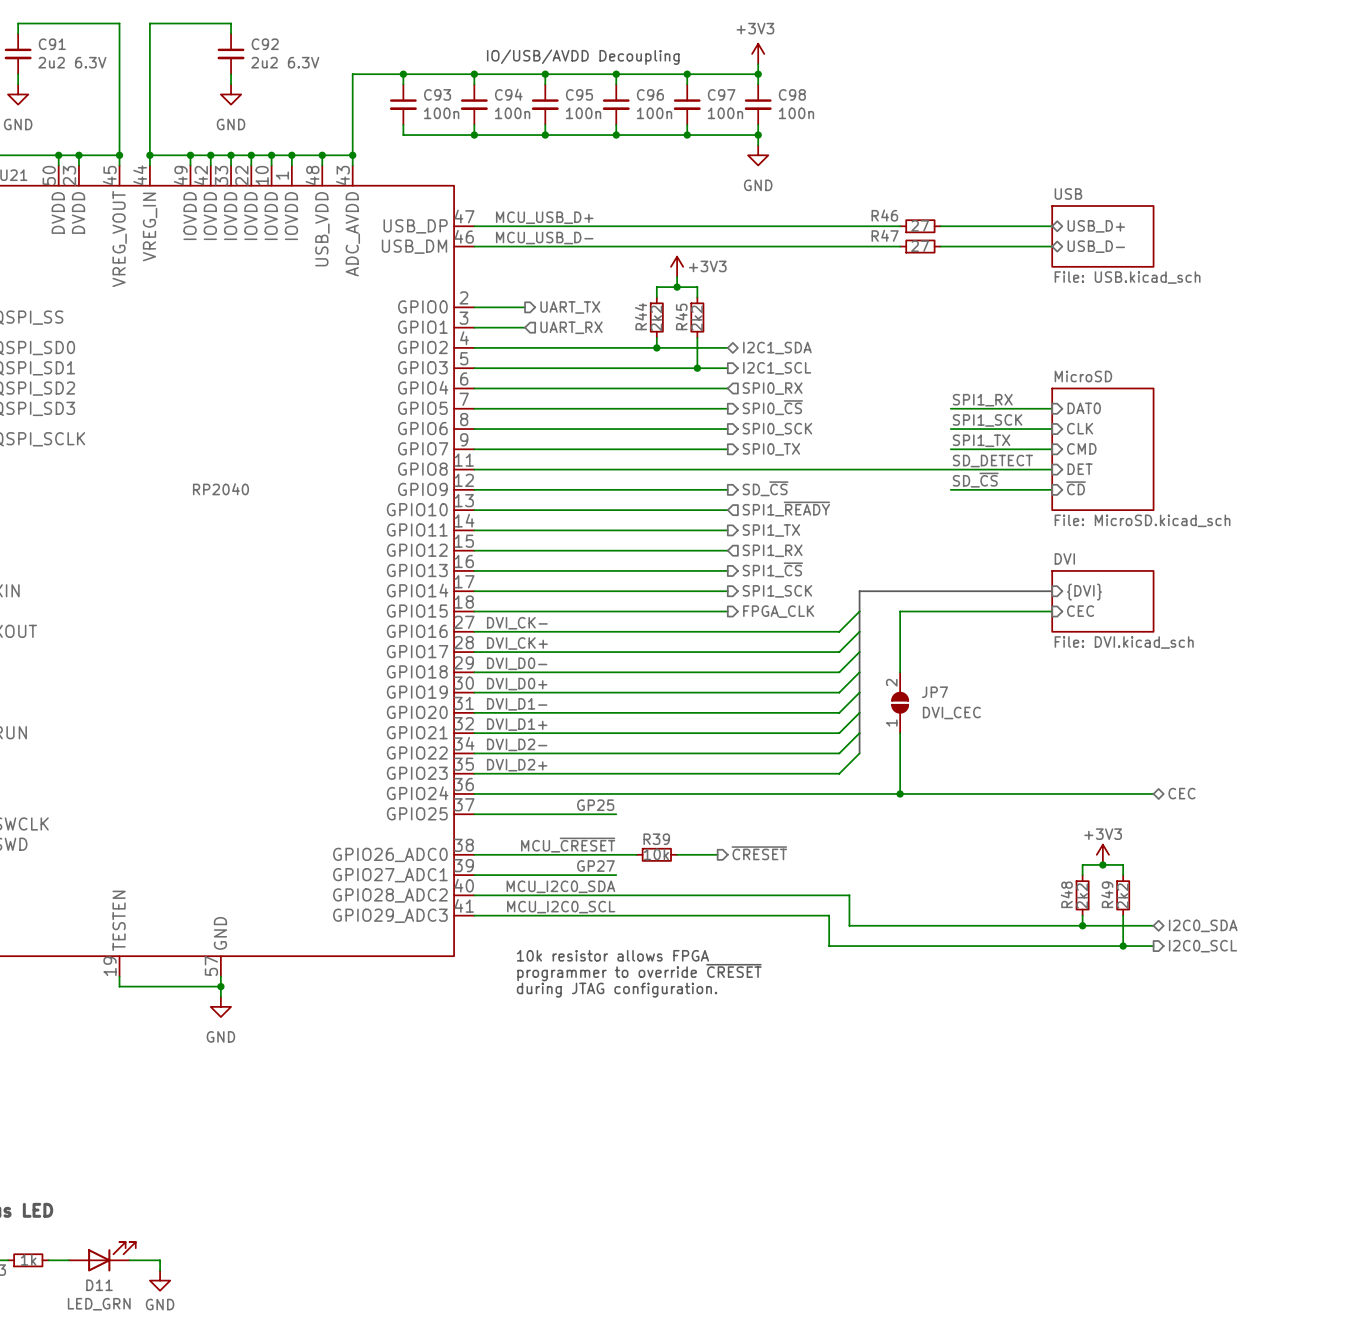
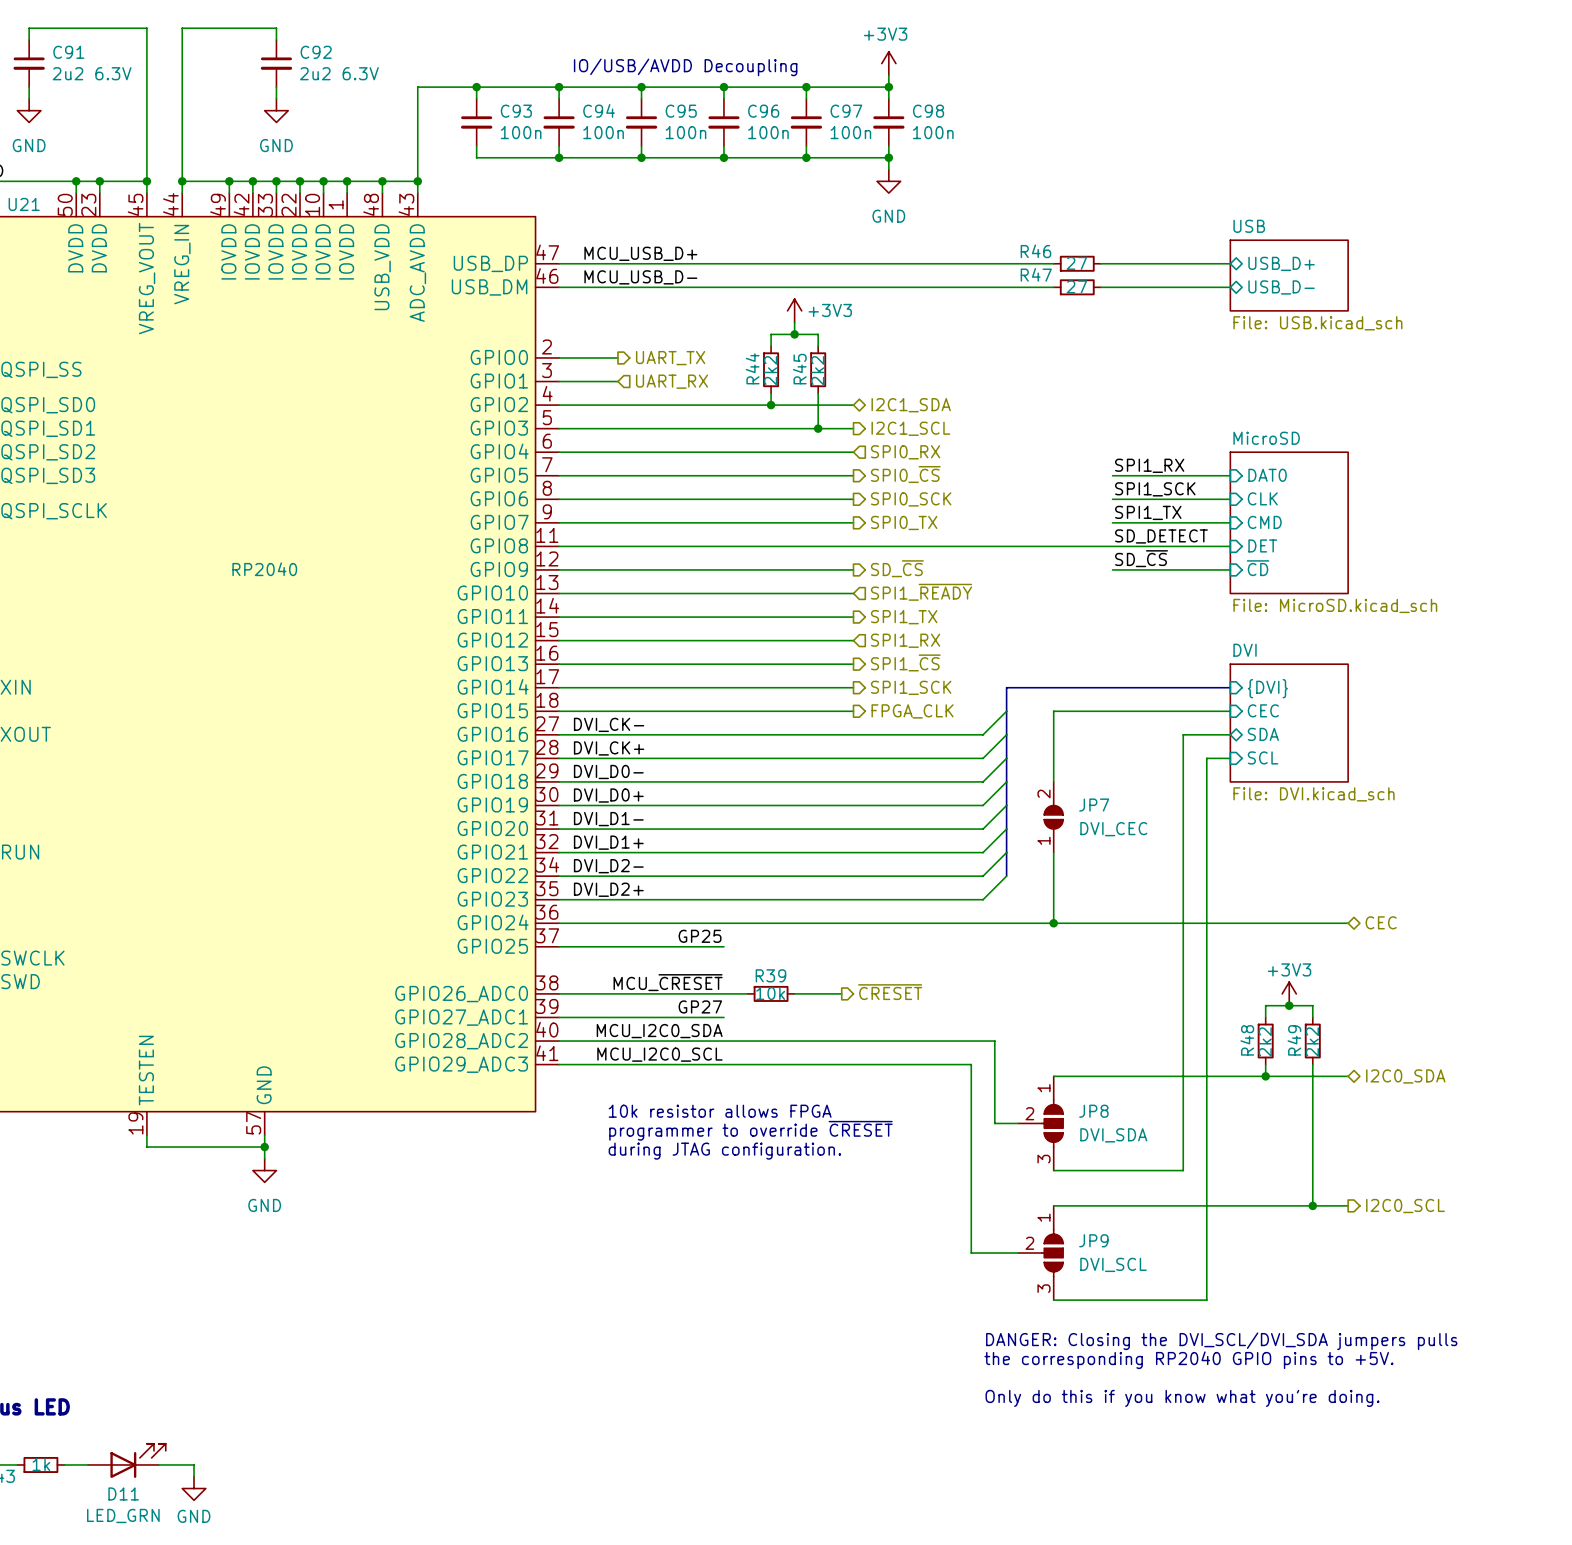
sheet DVI: File: DVI.kicad_sch (1102, 601) -> none
sheet DVI: none -> File: DVI.kicad_sch (1289, 723)
wire: none -> (1230, 734) (1183, 734) (1183, 1170) (1053, 1170)
sheet pin: none -> SDA (1263, 734)
sheet pin: none -> SCL (1263, 757)
wire: none -> (1230, 758) (1206, 758) (1206, 1300) (1053, 1300)
wire: (849, 925) (900, 925) -> (994, 1076) (994, 1123) (1018, 1123)
wire: (829, 946) (1153, 946) -> (971, 1099) (971, 1253) (1018, 1253)
wire: none -> (1312, 1099) (1312, 1205)
junction: (1123, 946) -> none
hierarchical label position: I2C0_SCL (1202, 946) -> I2C0_SCL (1405, 1206)
JP8: none -> DVI_SDA (1040, 1123)
wire: none -> (1053, 1205) (1348, 1205)
junction: none -> (1312, 1205)
JP9: none -> DVI_SCL (1040, 1253)
text: none -> DANGER: Closing the DVI_SCL/DVI_SDA jumpers pulls (1221, 1341)
text: none -> the corresponding RP2040 GPIO pins to +5V. (1188, 1360)
text: none -> Only do this if you know what you're doing. (1182, 1398)

